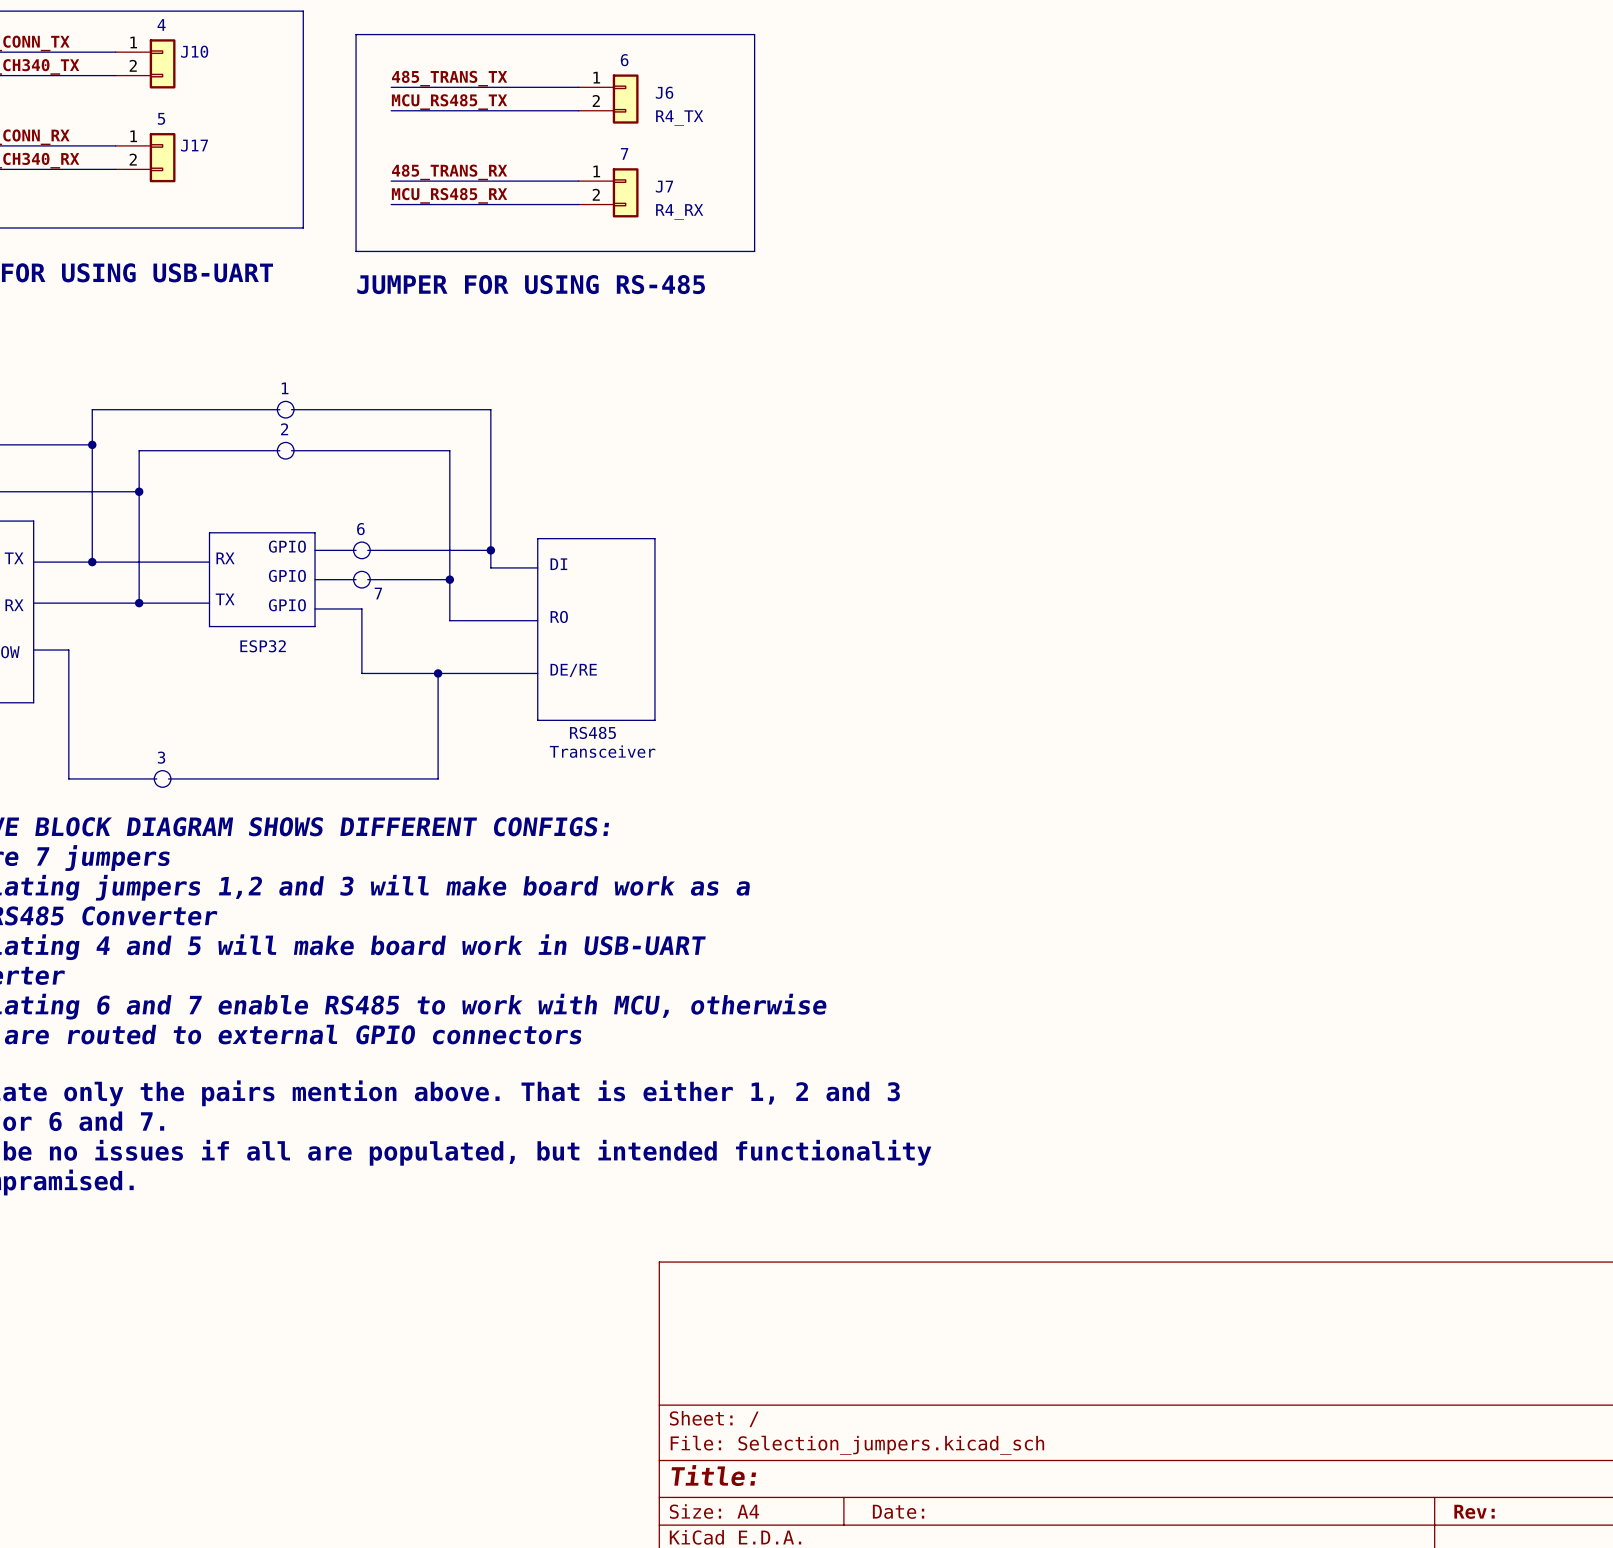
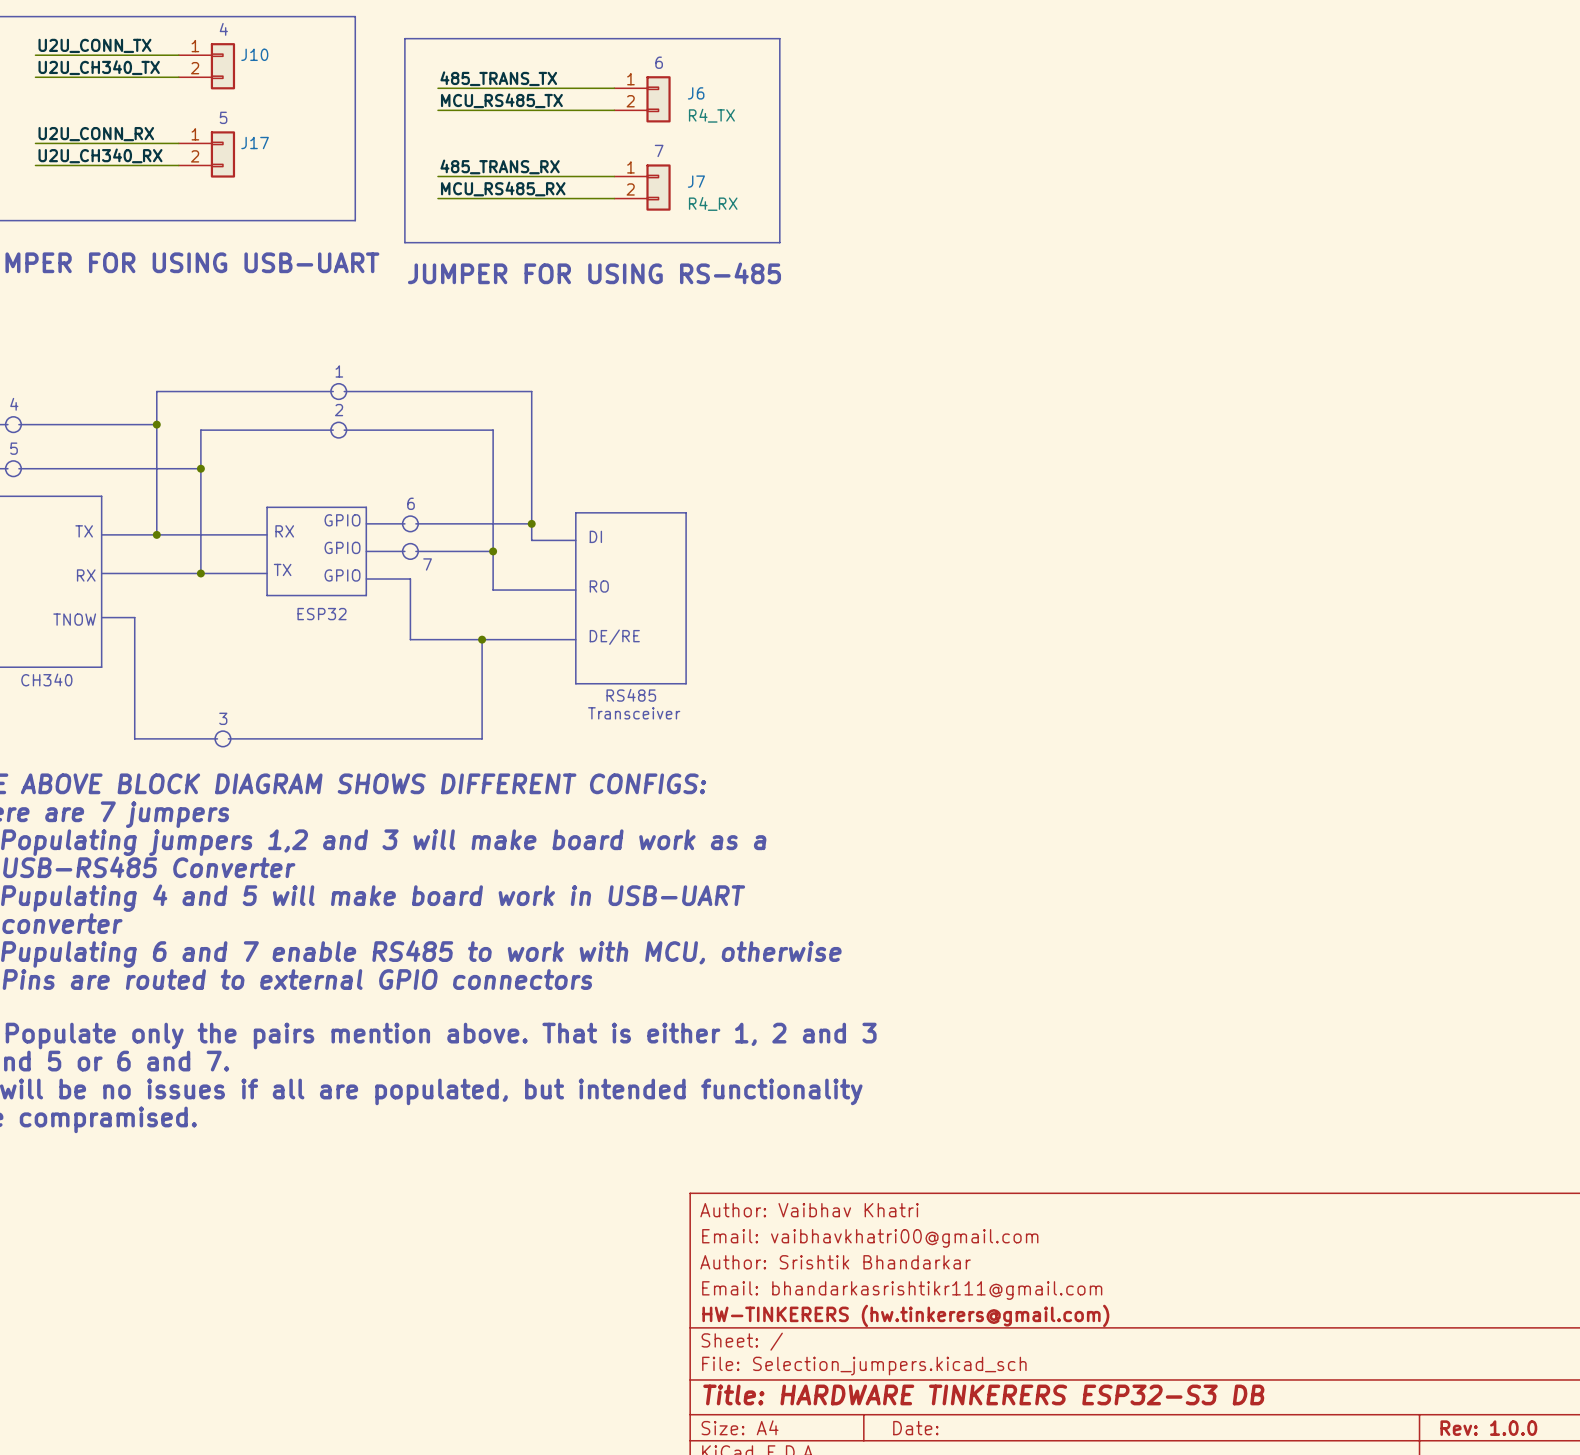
title block: none -> Author: Vaibhav Khatri (809, 1210)
title block: none -> Email: vaibhavkhatri00@gmail.com (870, 1238)
title block: none -> Author: Srishtik Bhandarkar (835, 1262)
title block: none -> Email: bhandarkasrishtikr111@gmail.com (902, 1290)
title block: none -> HW-TINKERERS (hw.tinkerers@gmail.com) (905, 1315)
title block: Title: (713, 1475) -> Title: HARDWARE TINKERERS ESP32-S3 DB (983, 1394)
title block: Rev: (1474, 1511) -> Rev: 1.0.0 (1488, 1428)

